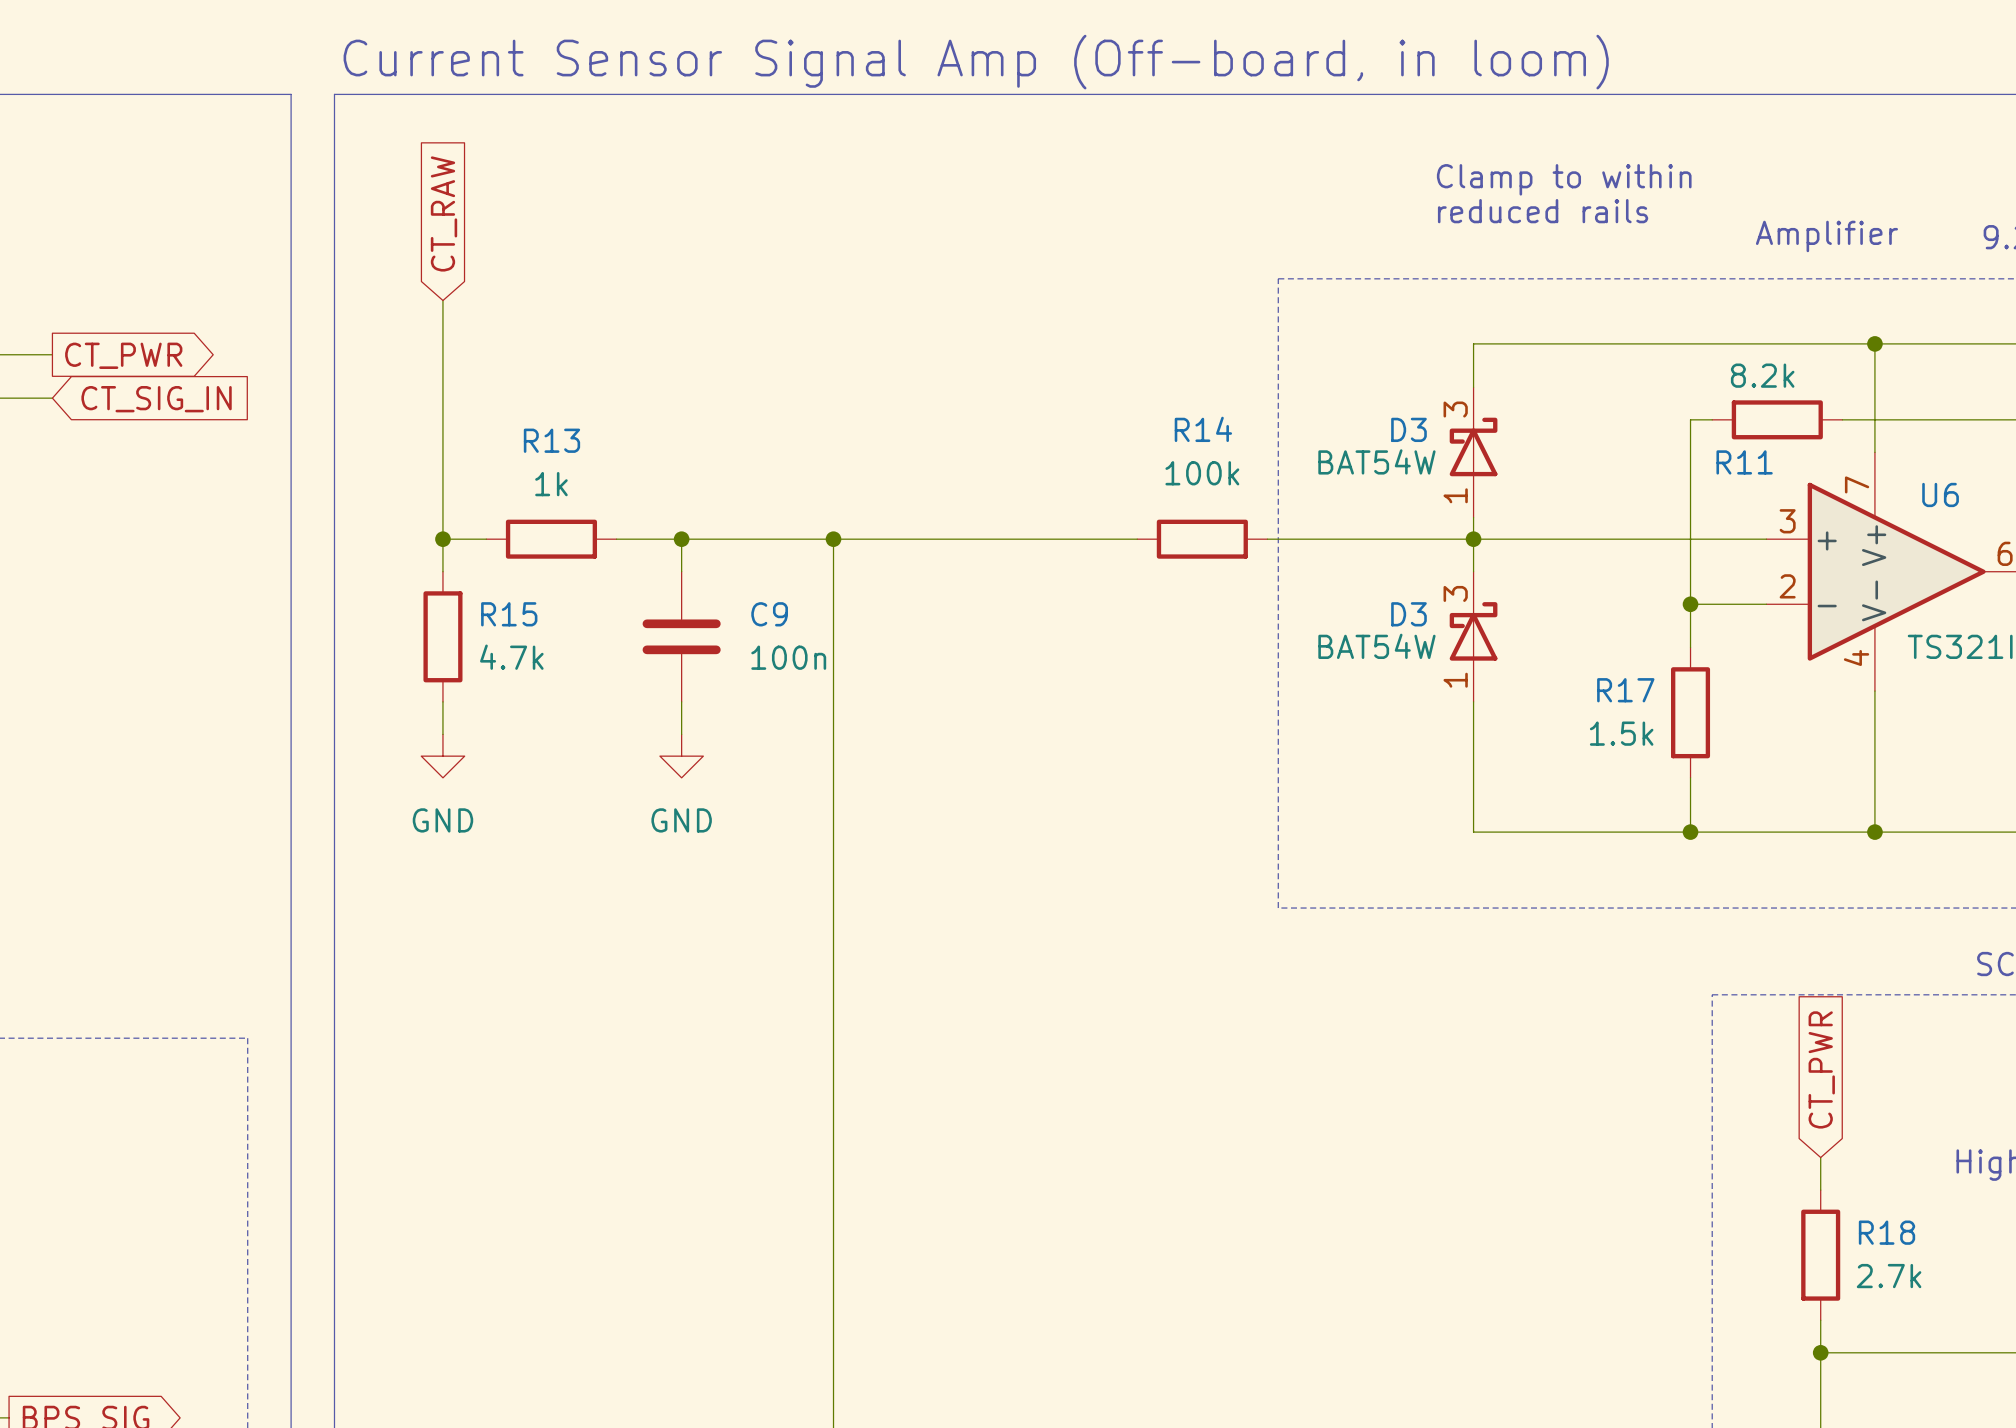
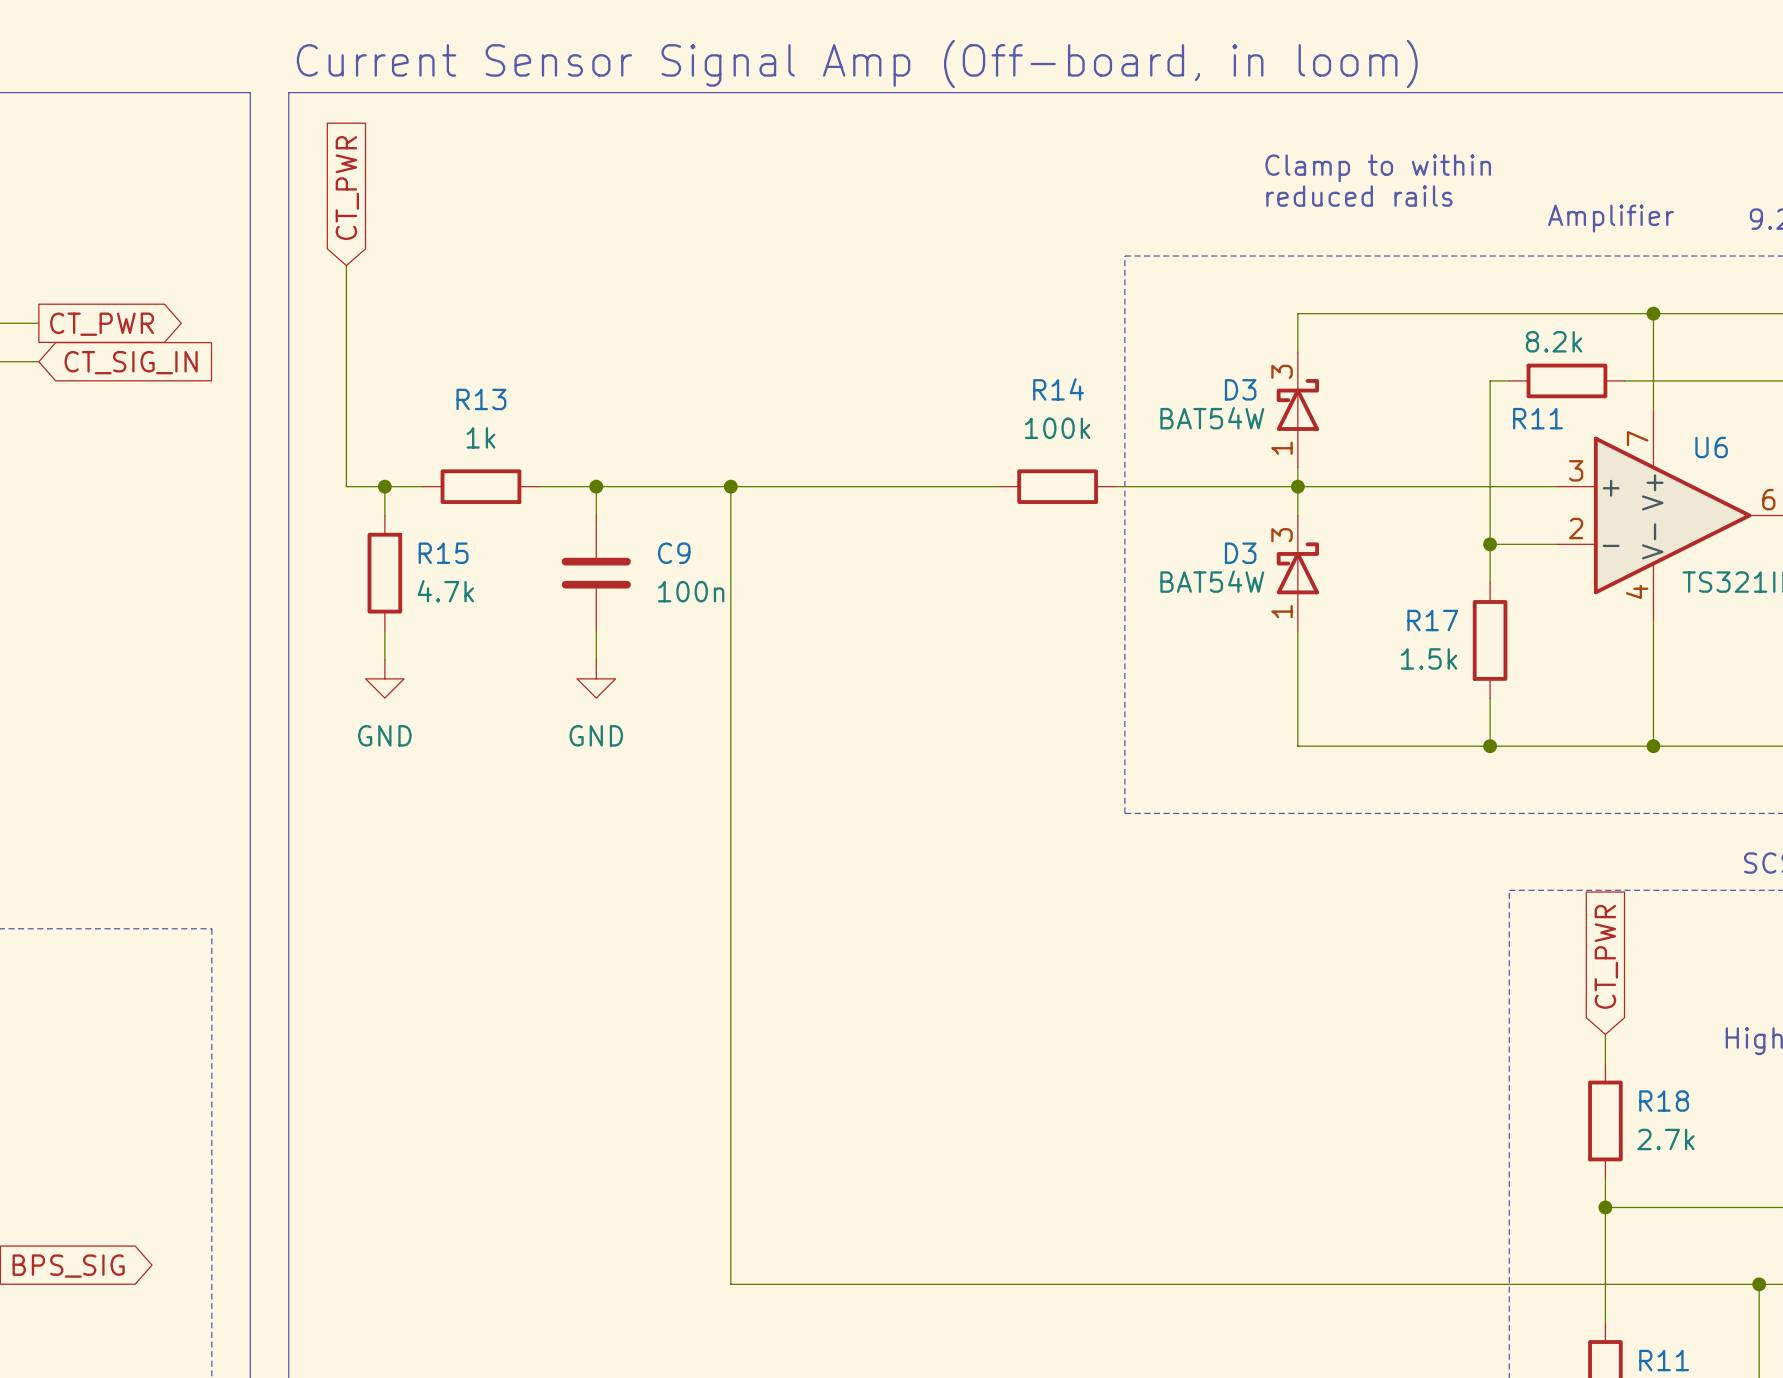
global label: CT_RAW (444, 213) -> CT_PWR (347, 188)
wire: (442, 300) (442, 539) -> (346, 265) (346, 486) (384, 486)

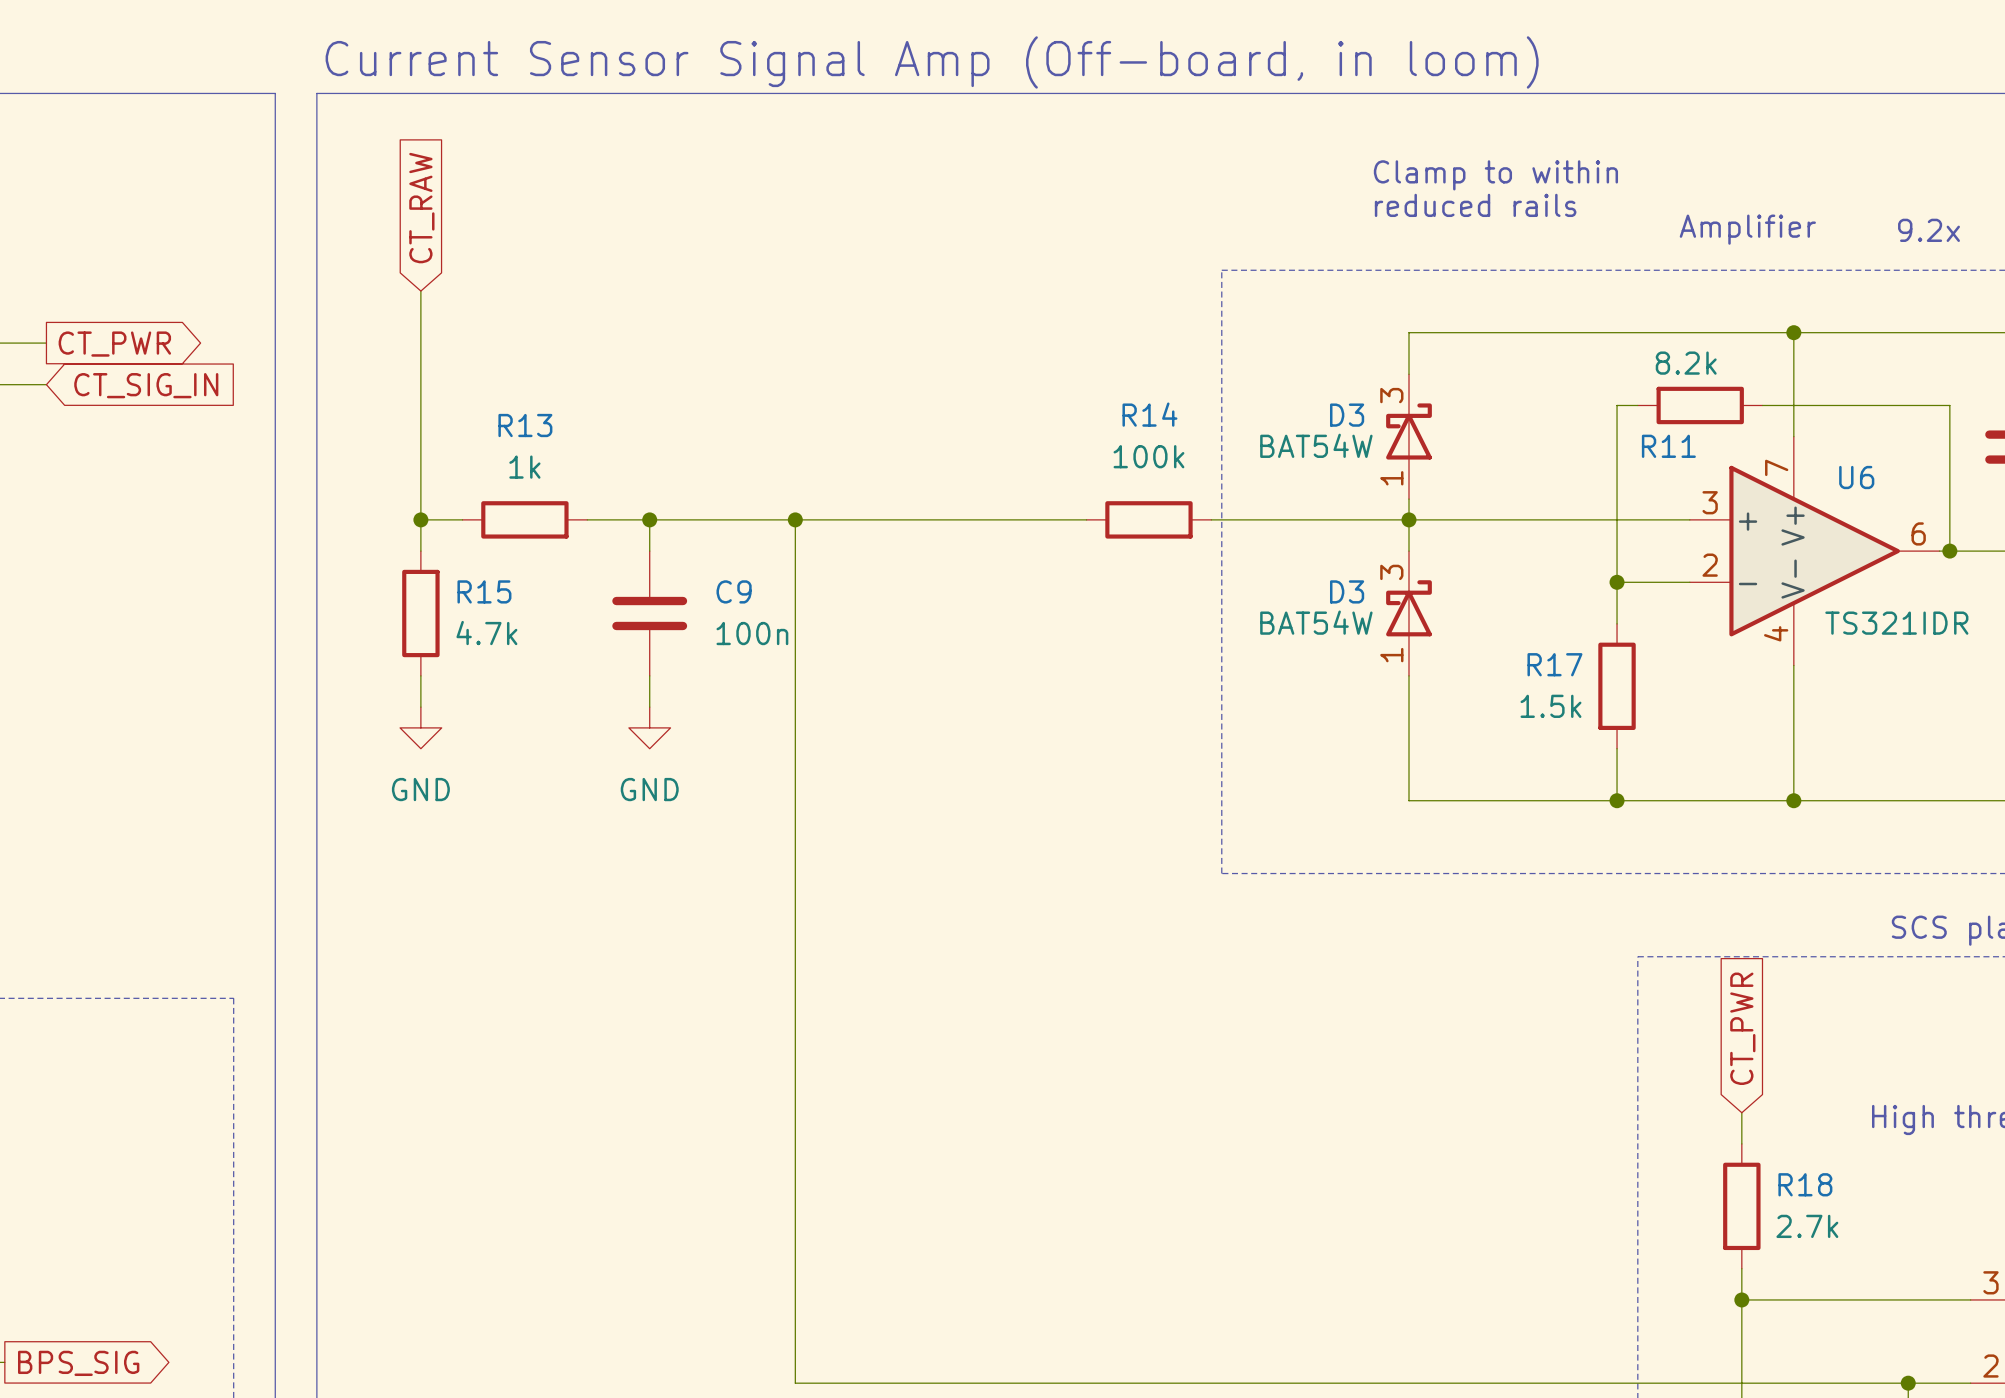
global label: CT_PWR (347, 188) -> CT_RAW (421, 208)
wire: (346, 265) (346, 486) (384, 486) -> (420, 291) (420, 519)

